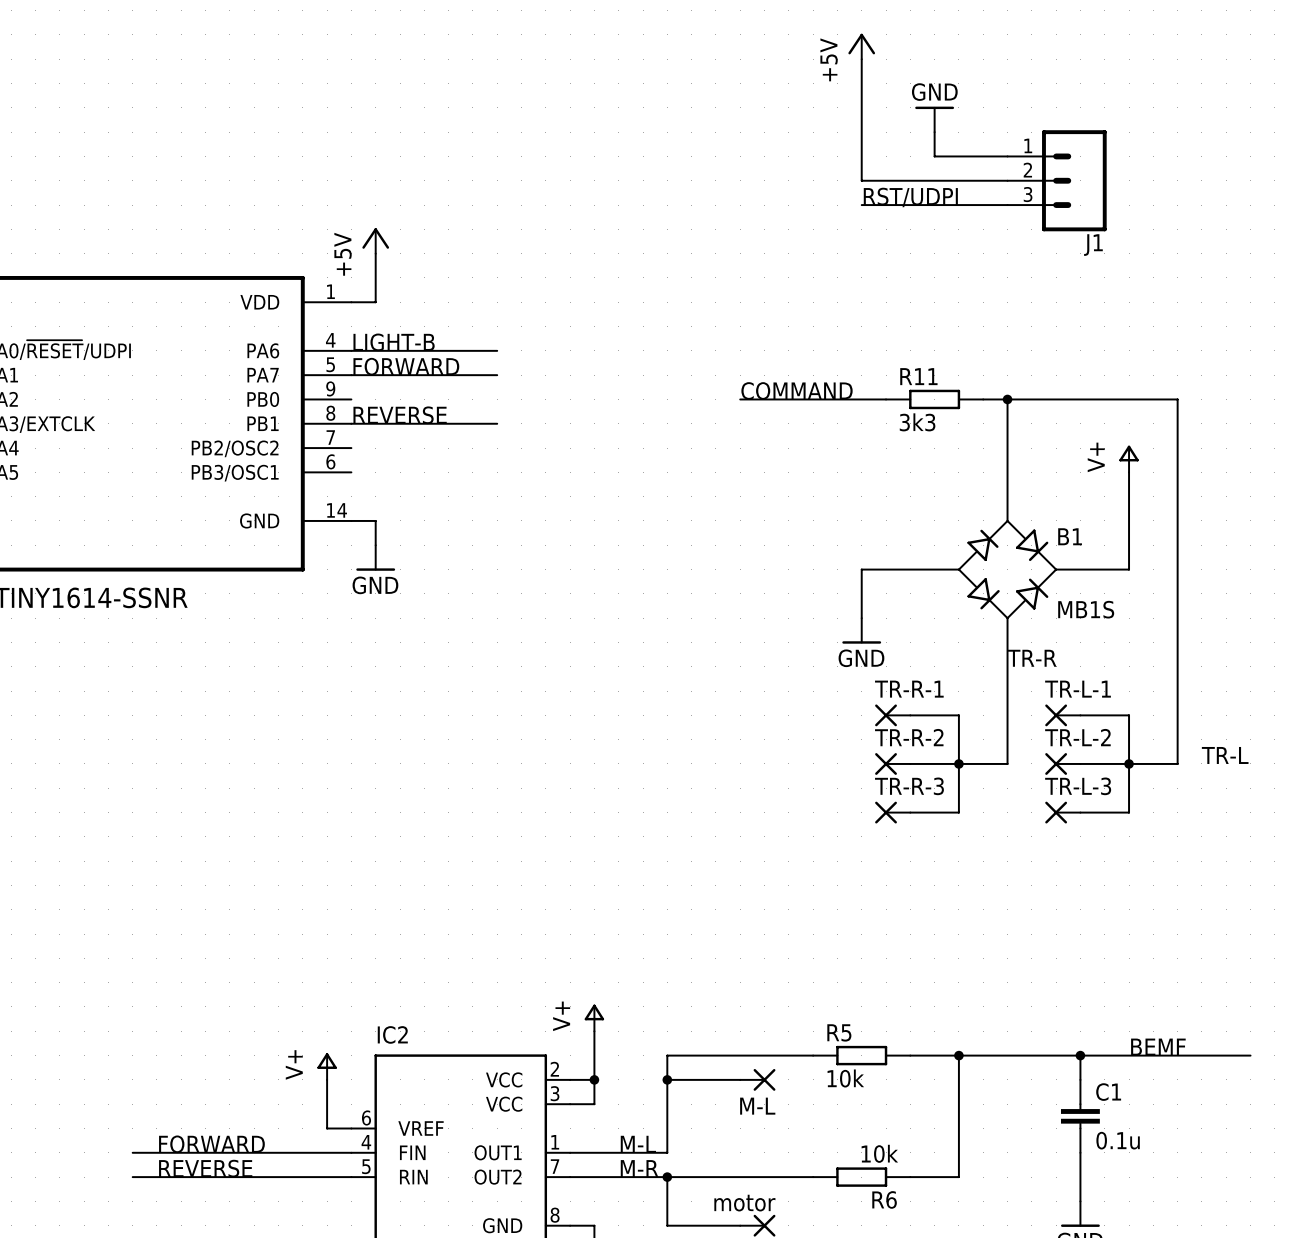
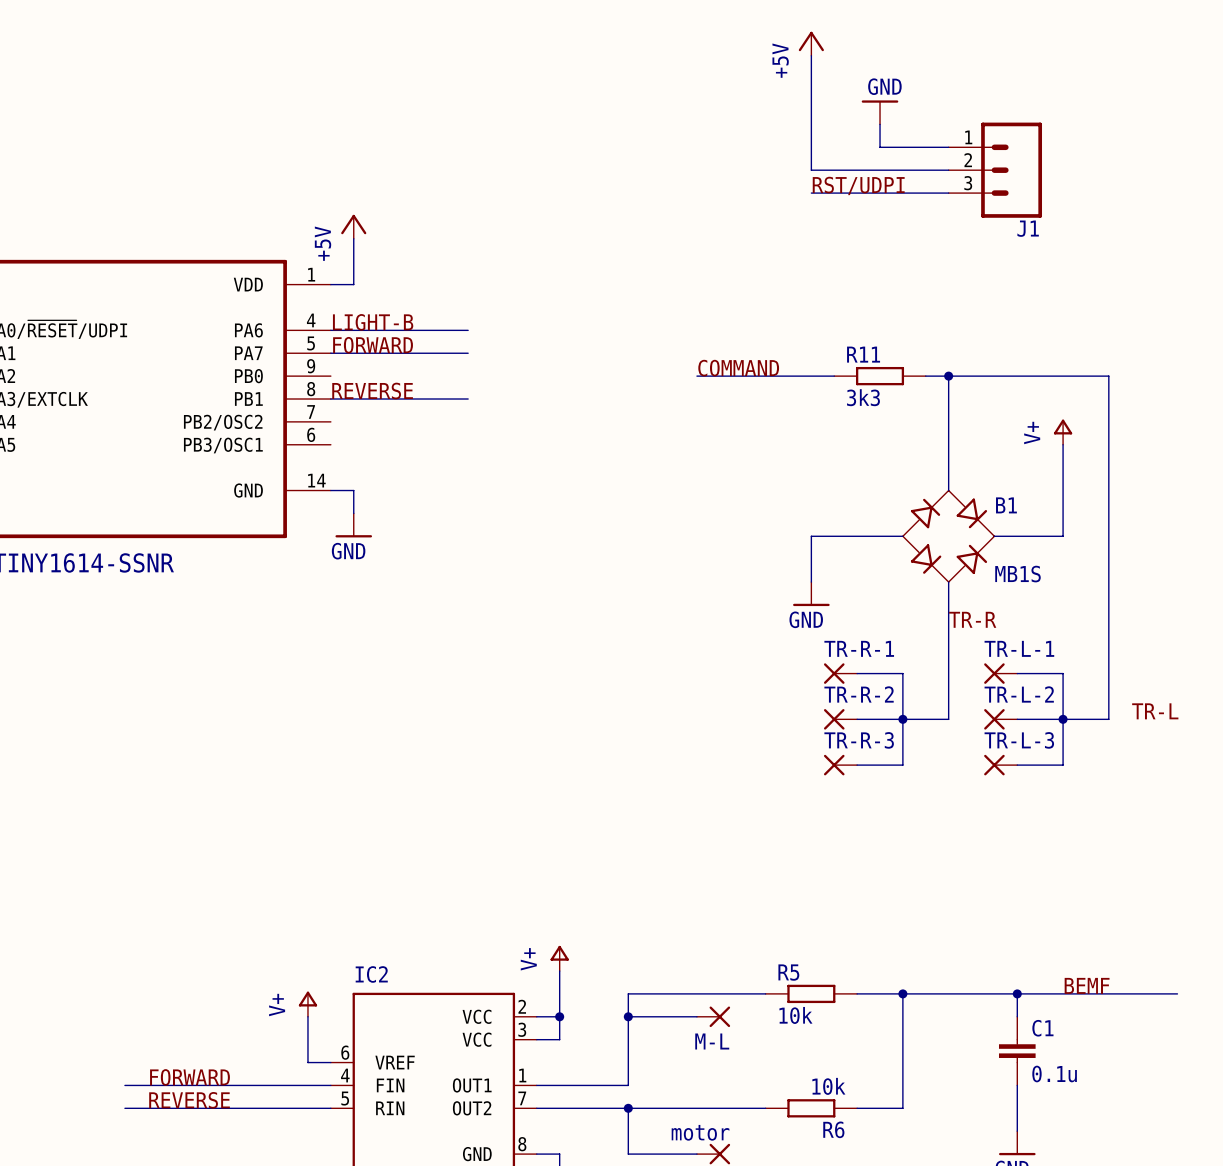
label: M-L (638, 1144) -> none
label: M-R (639, 1168) -> none

